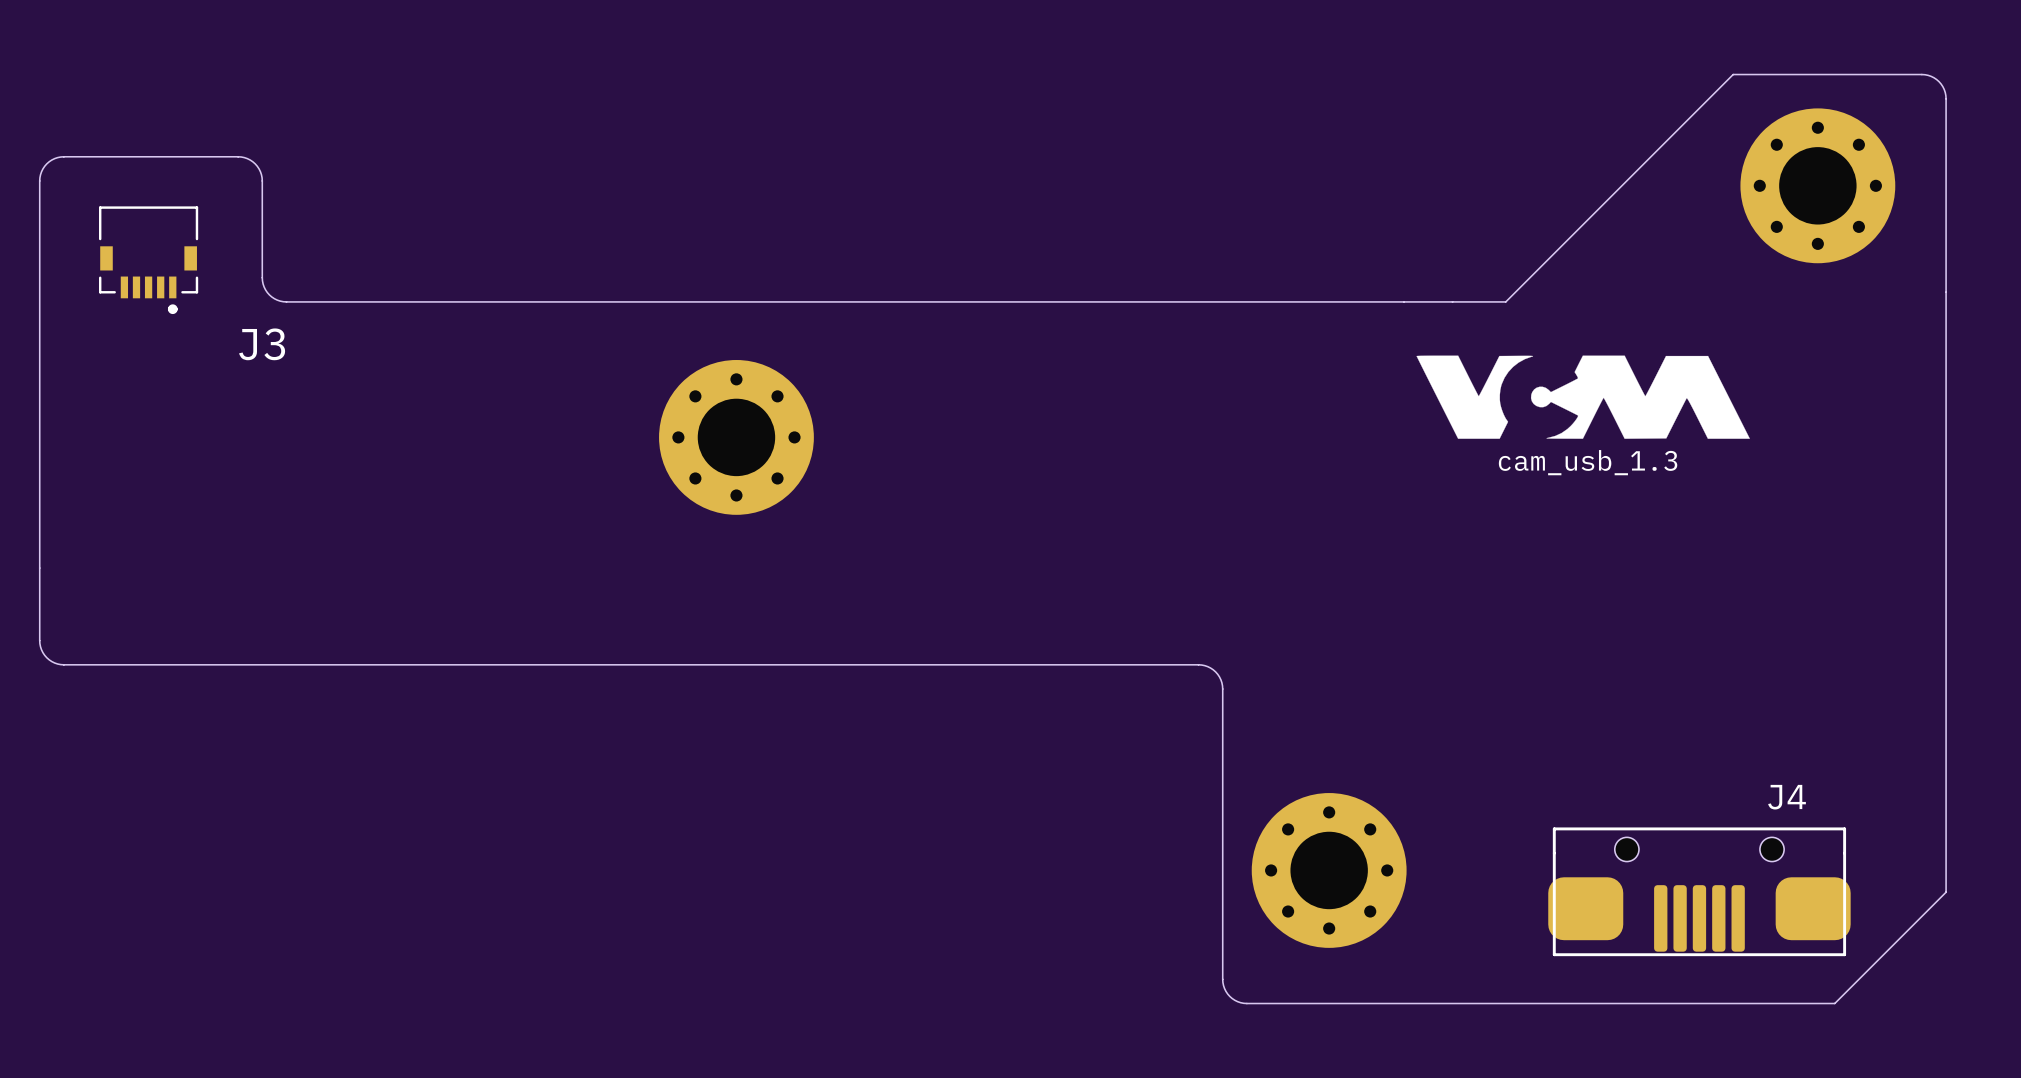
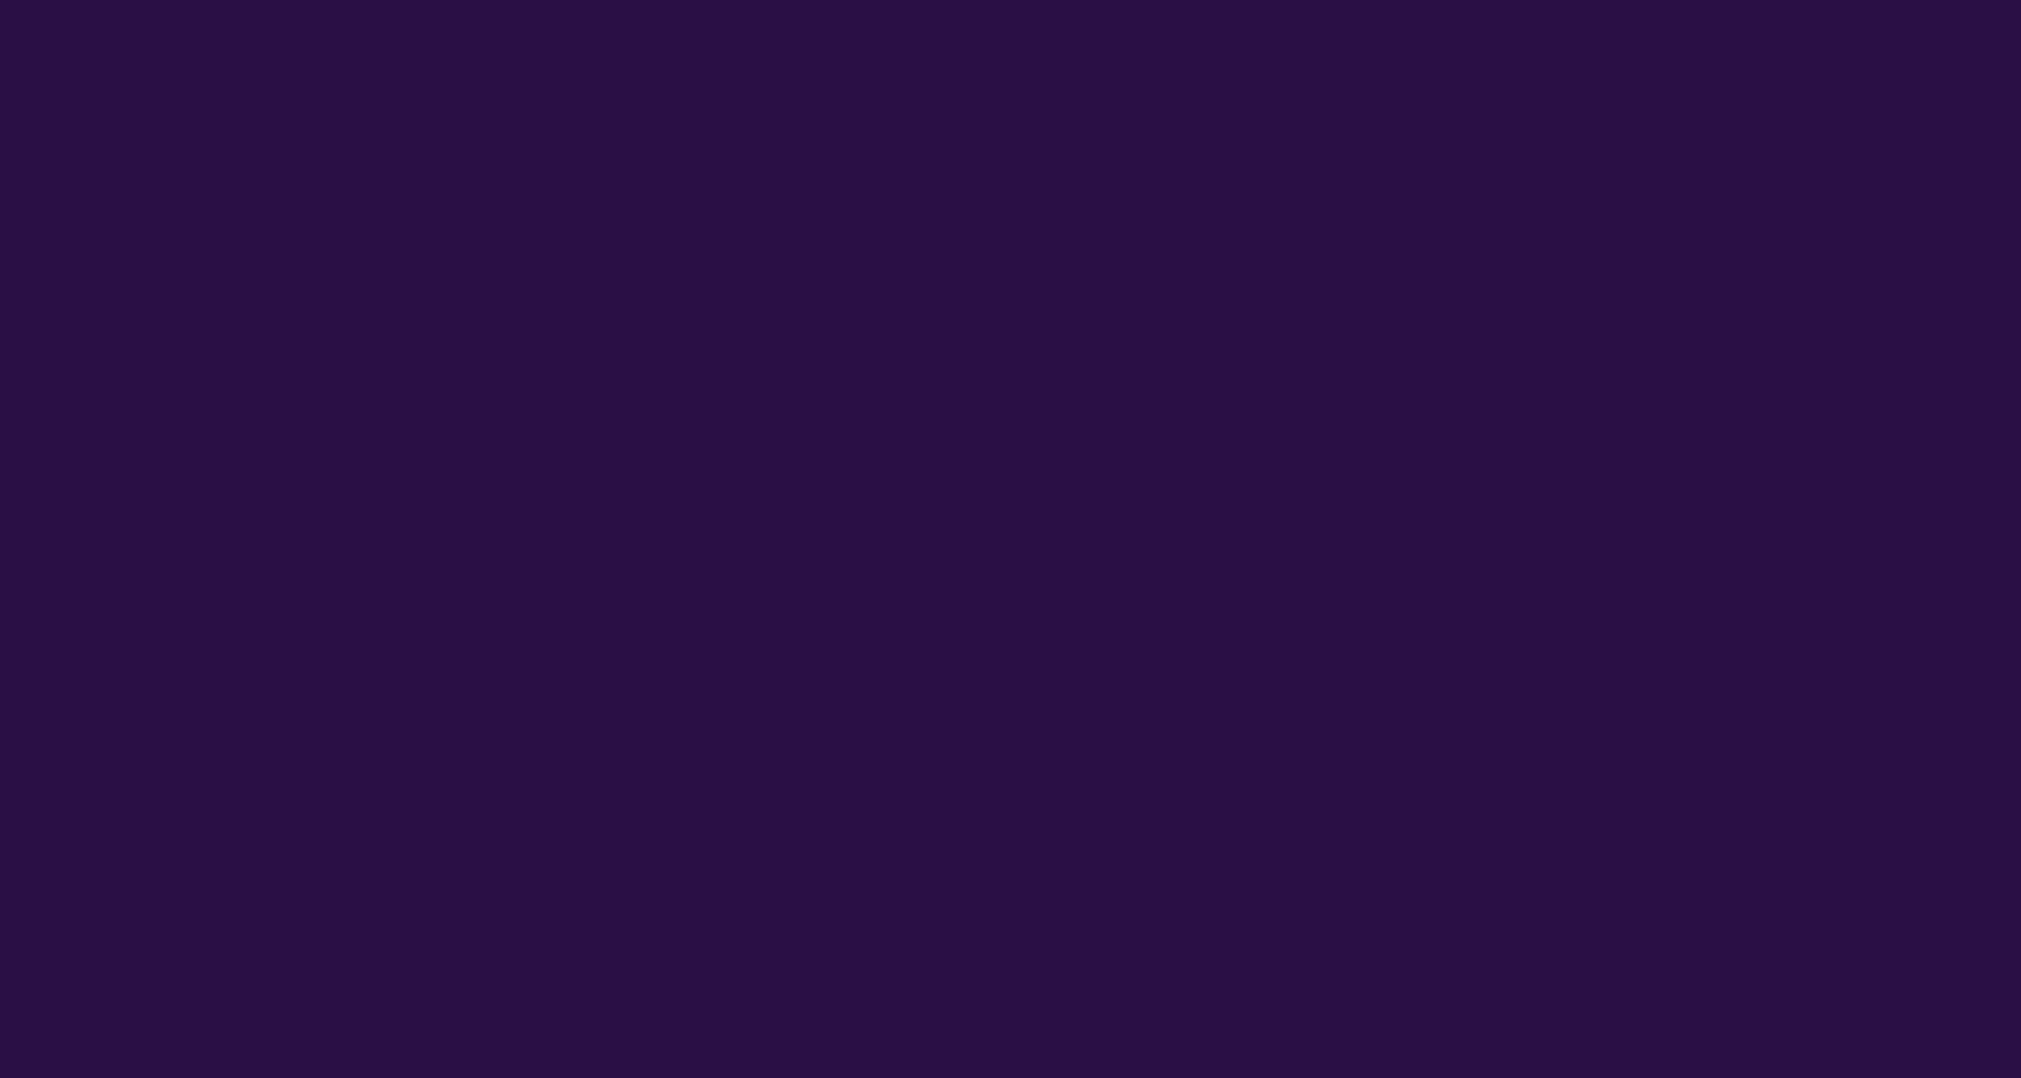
board edge: (1733, 74) (1505, 301) (283, 301) (271, 296) (263, 284) (262, 177) (257, 166) (250, 160) (238, 156) (57, 157) (44, 166) (39, 180) (40, 646) (49, 659) (63, 664) (1201, 665) (1215, 671) (1222, 685) (1222, 979) (1225, 991) (1234, 1000) (1246, 1003) (1834, 1003) (1946, 892) (1945, 95) (1938, 81) (1925, 74) (1733, 74) -> none
part: (1817, 185) -> none
J3: (148, 260) -> none
drawing: [1416, 355, 1750, 439] -> none
part: (736, 437) -> none
text: cam_usb_1.3 (1588, 462) -> none
part: (1329, 870) -> none
J4: (1699, 891) -> none

